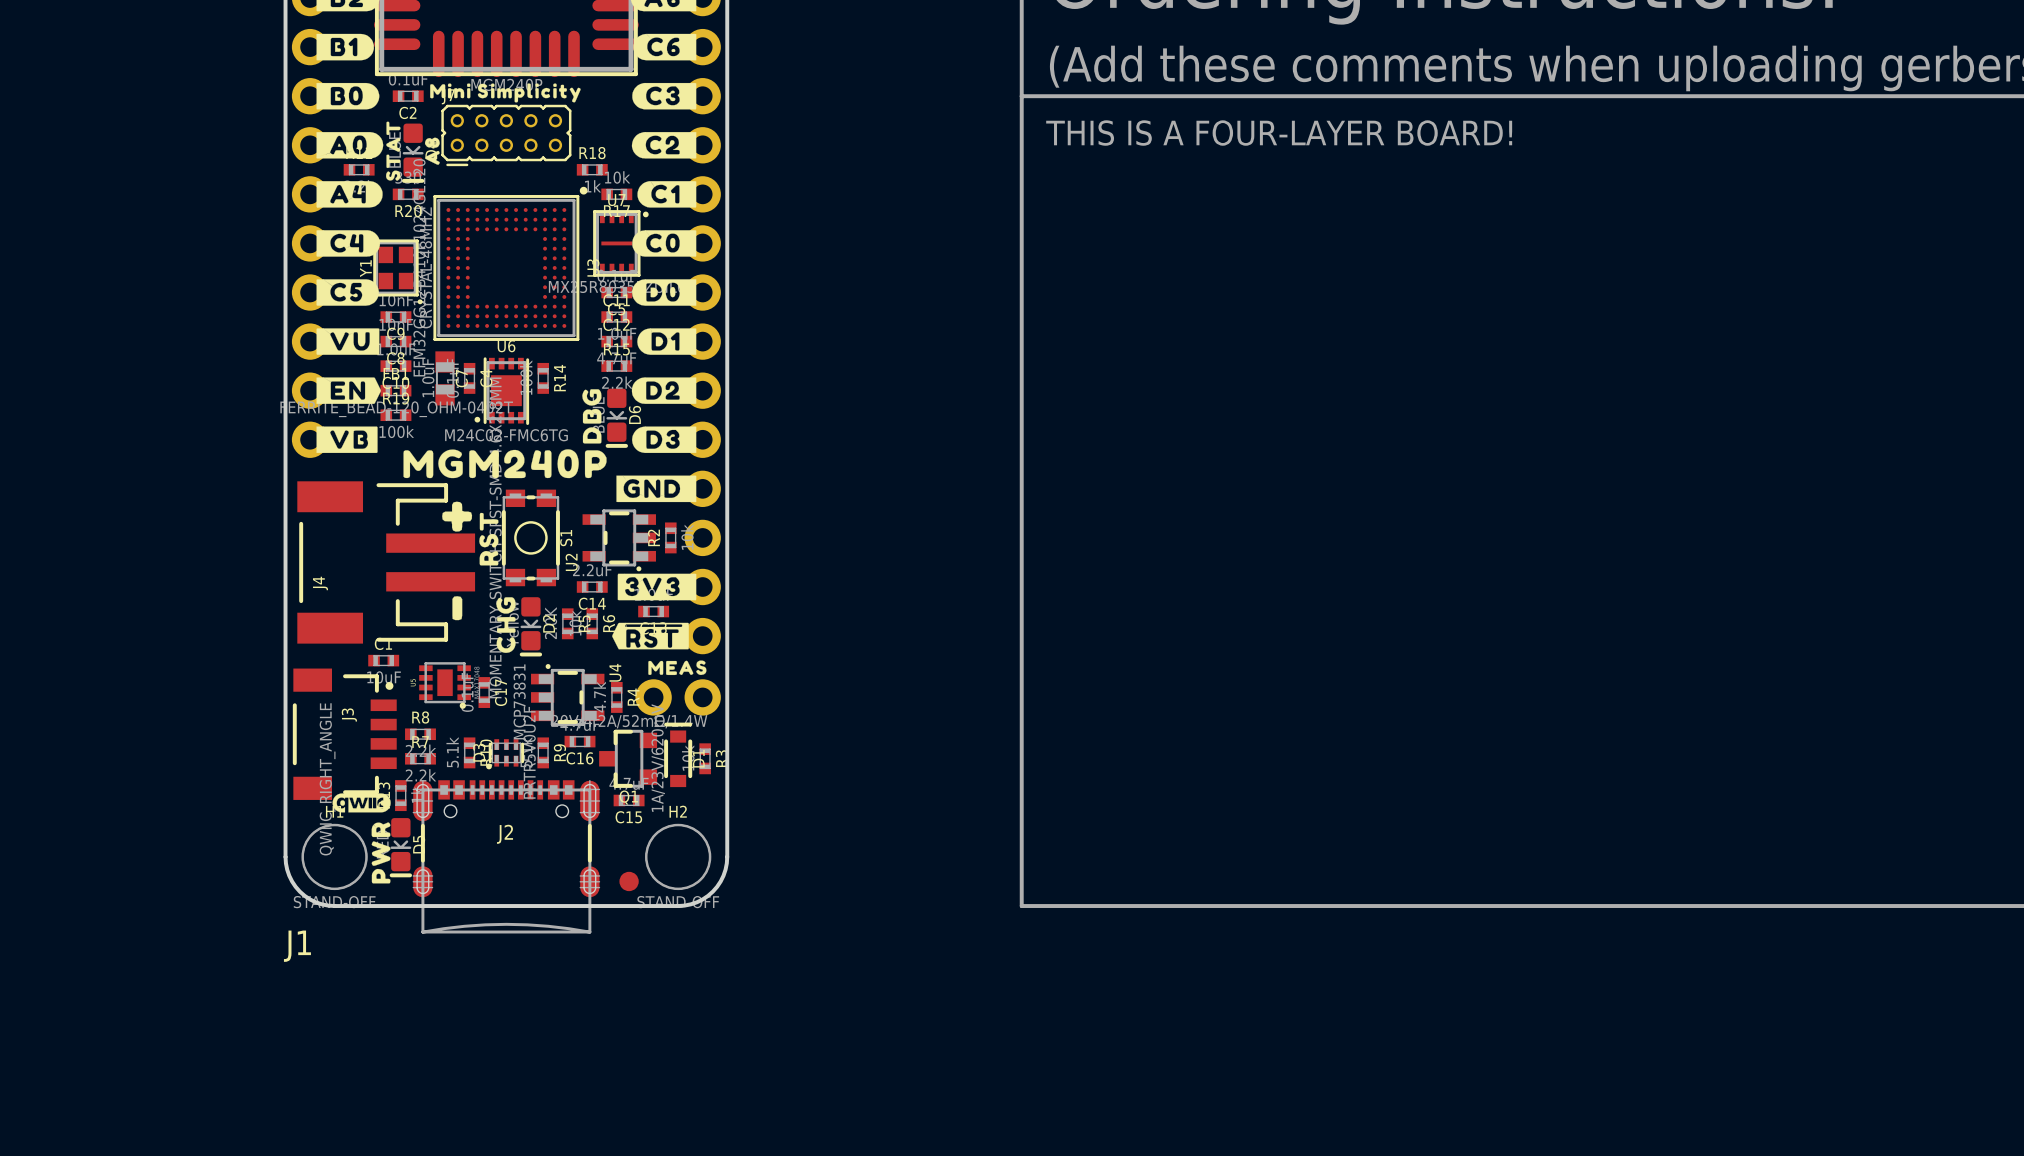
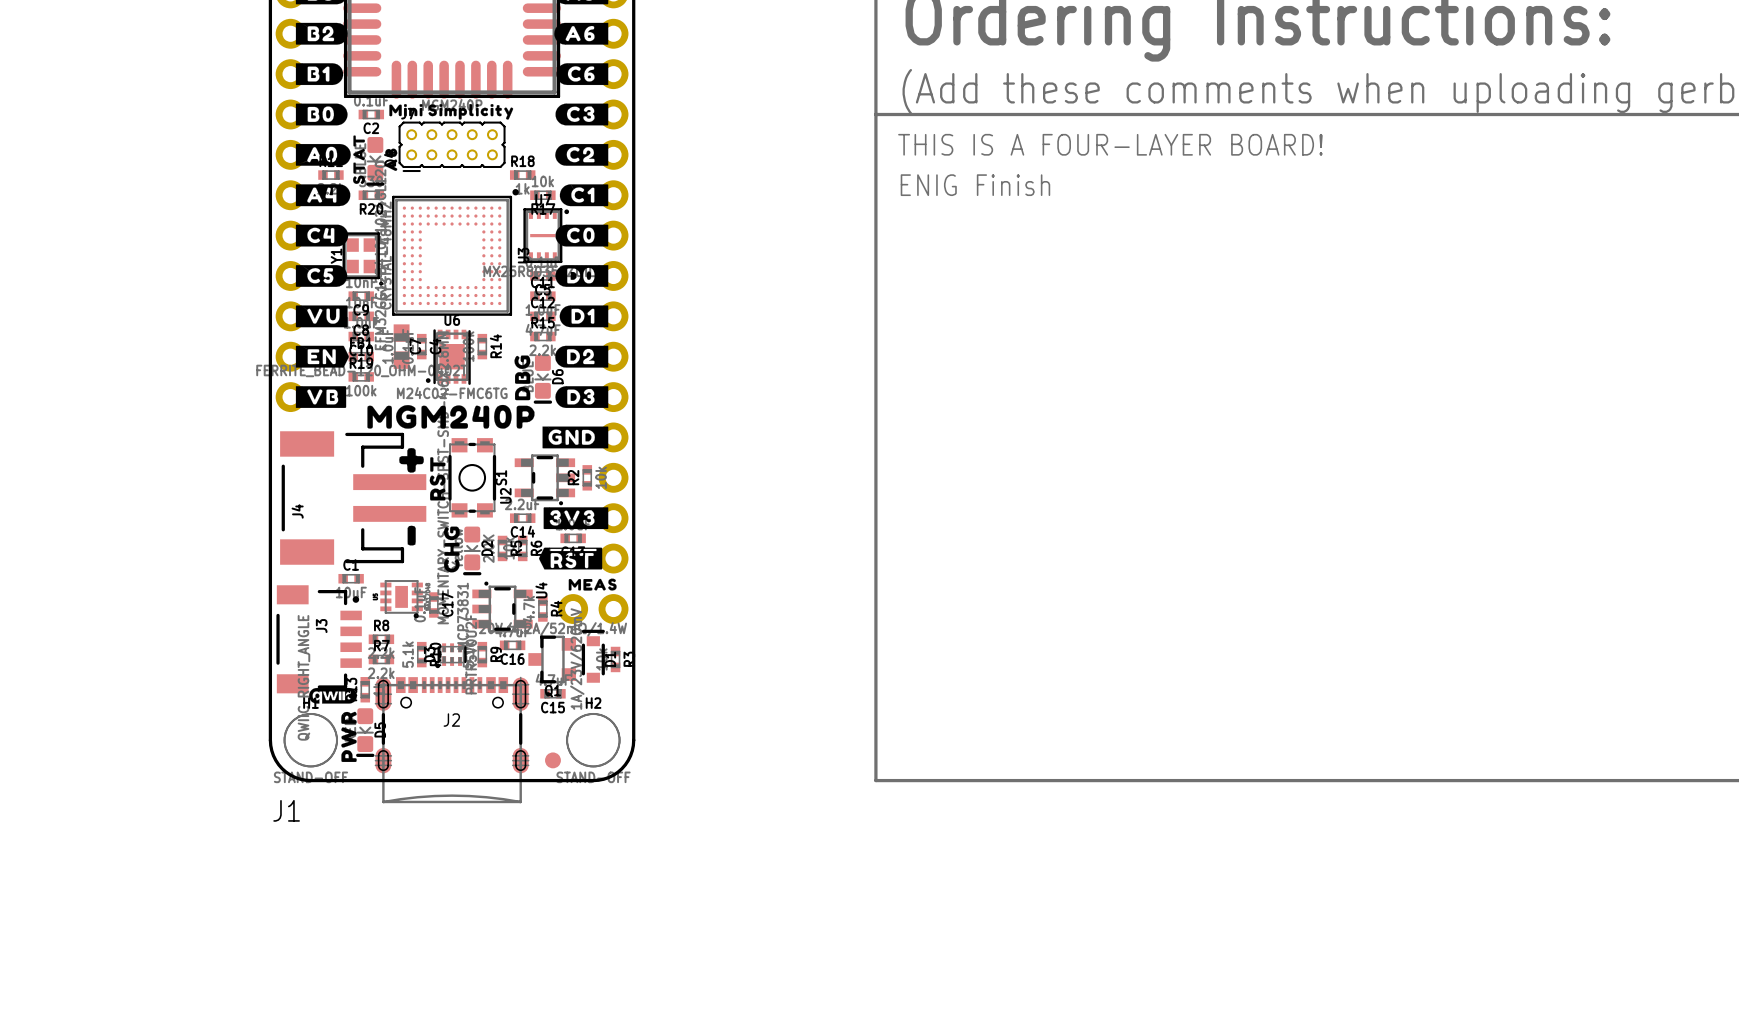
text: none -> ENIG Finish (975, 185)

